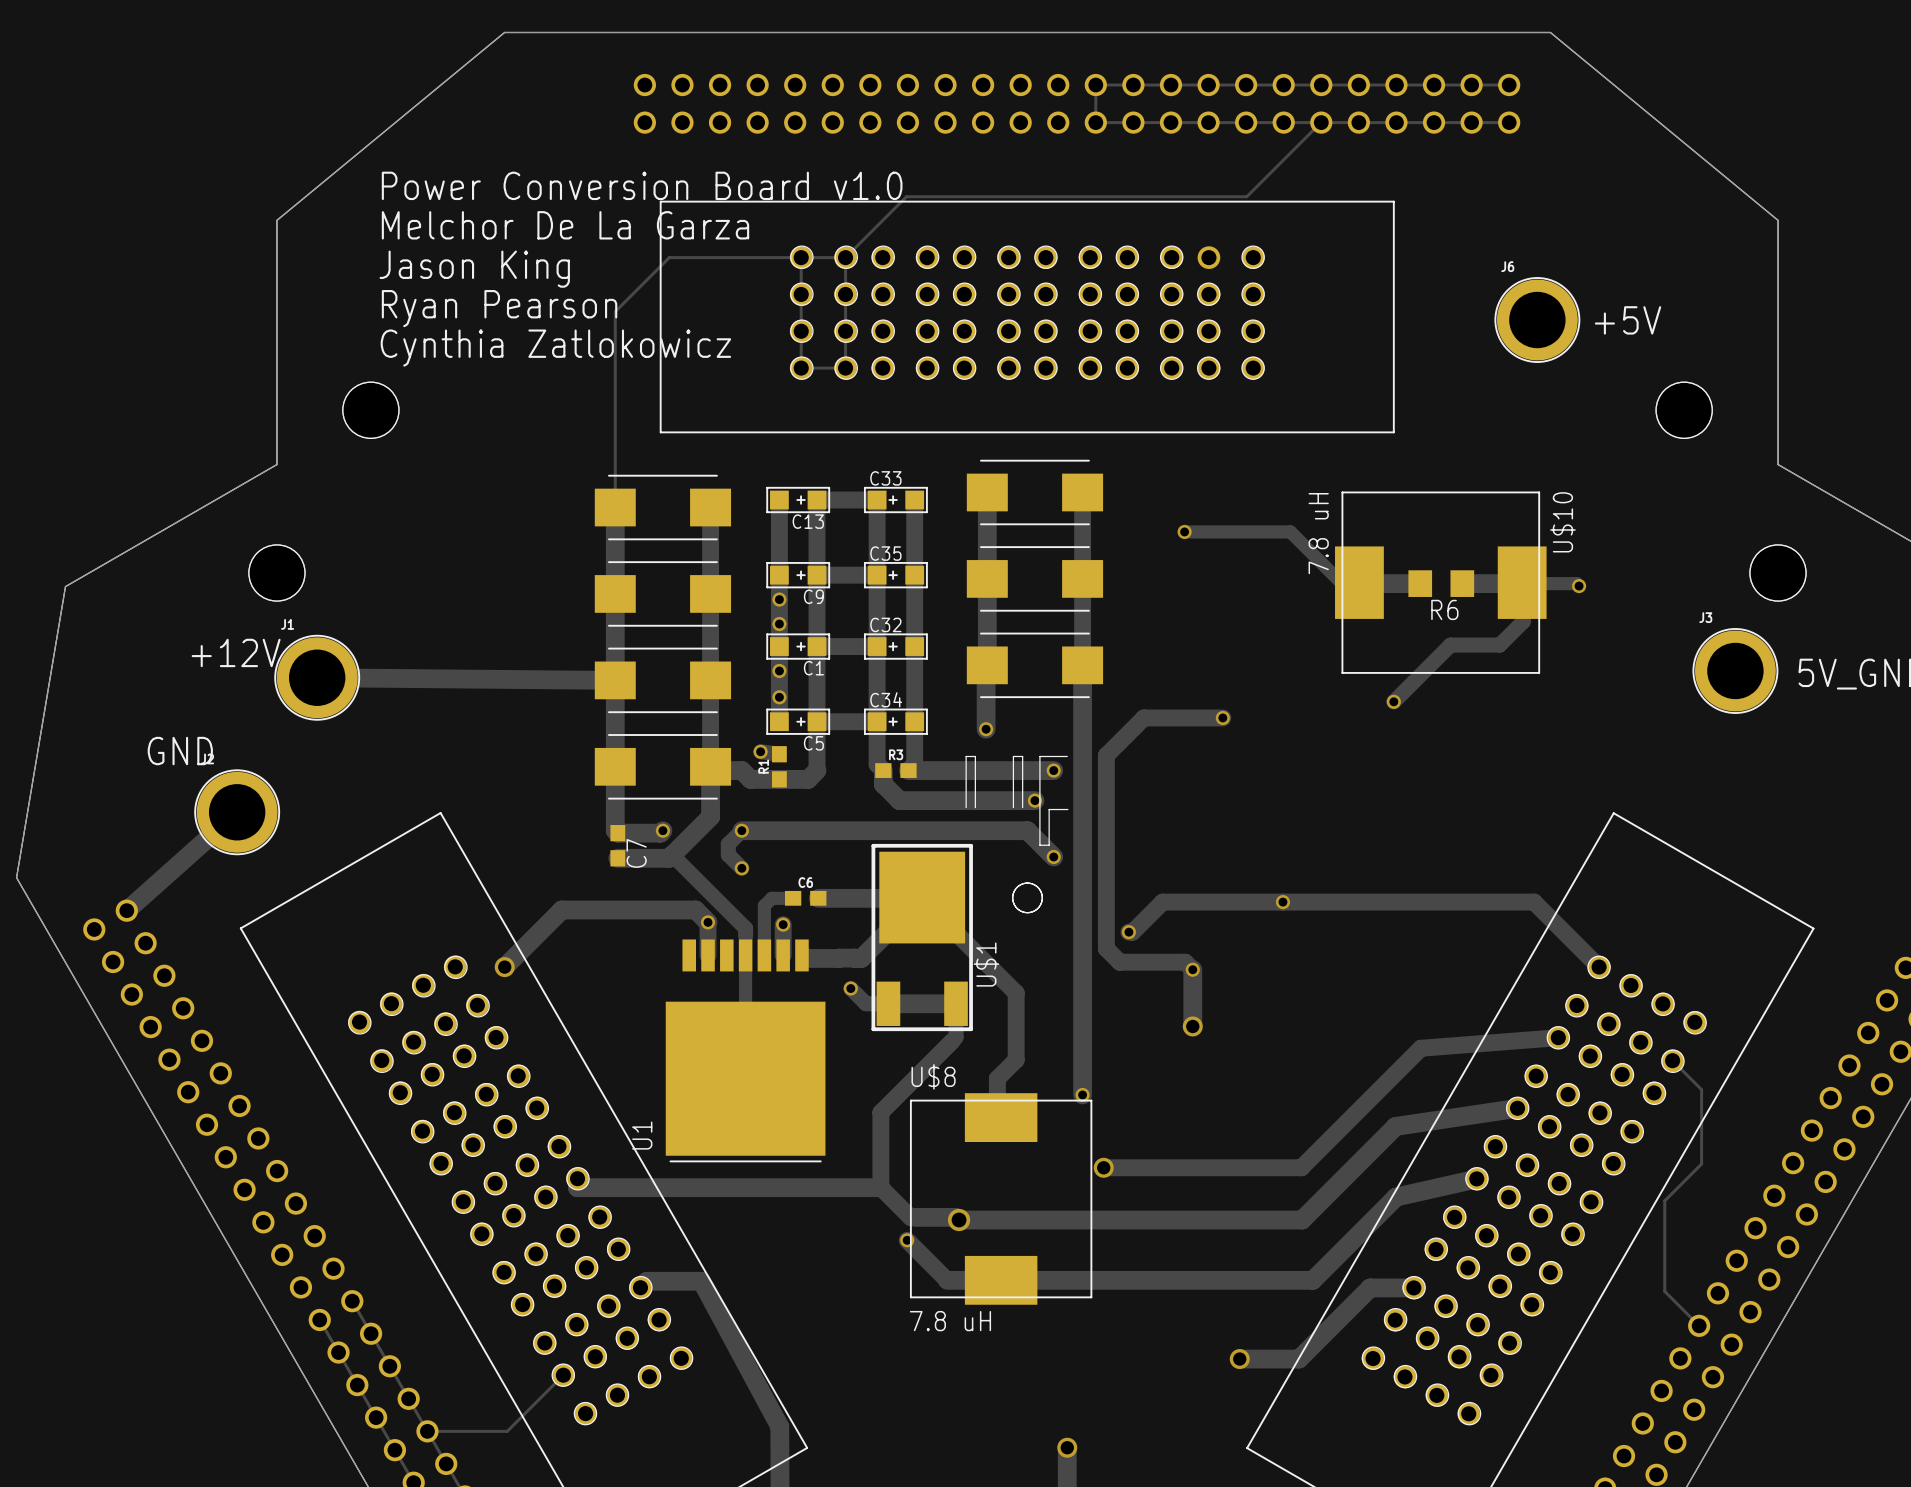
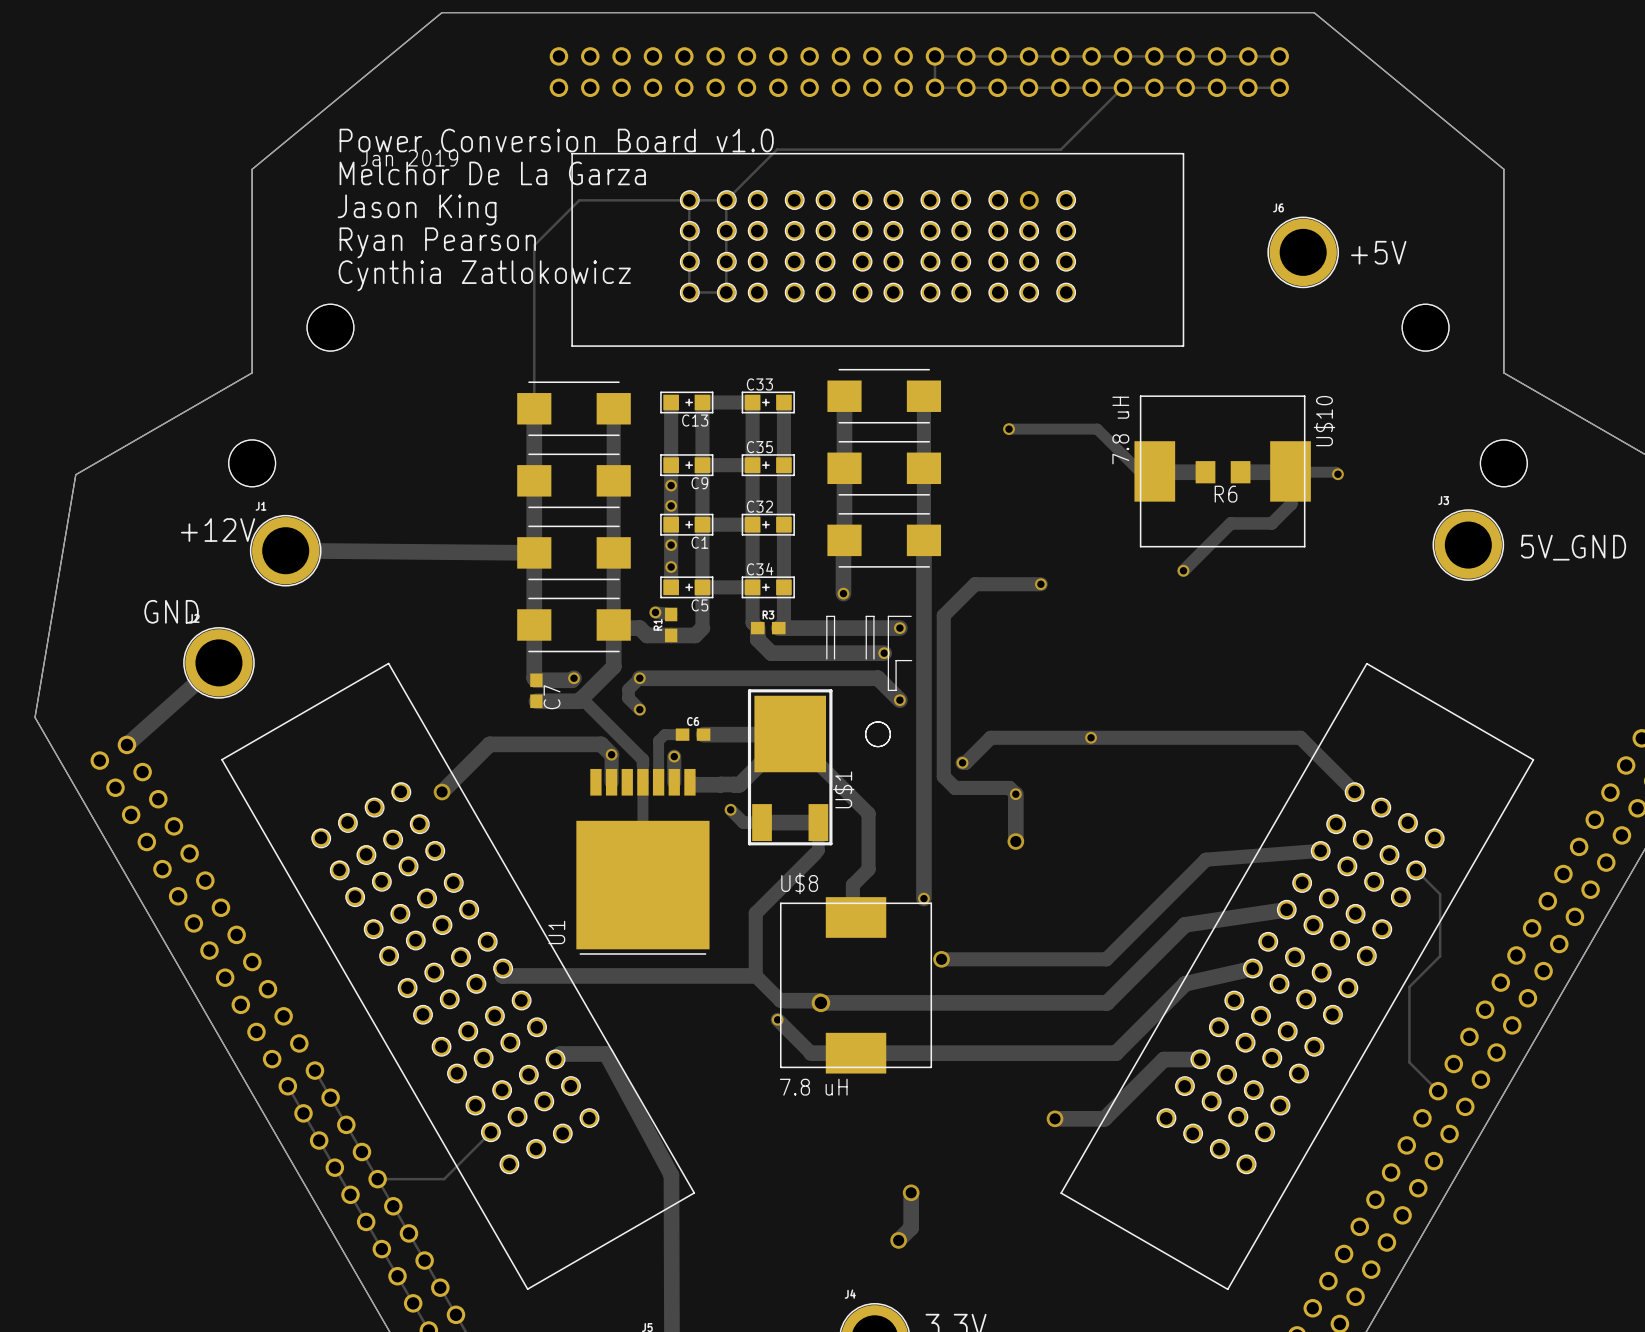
text: none -> Jan 2019 (409, 158)

